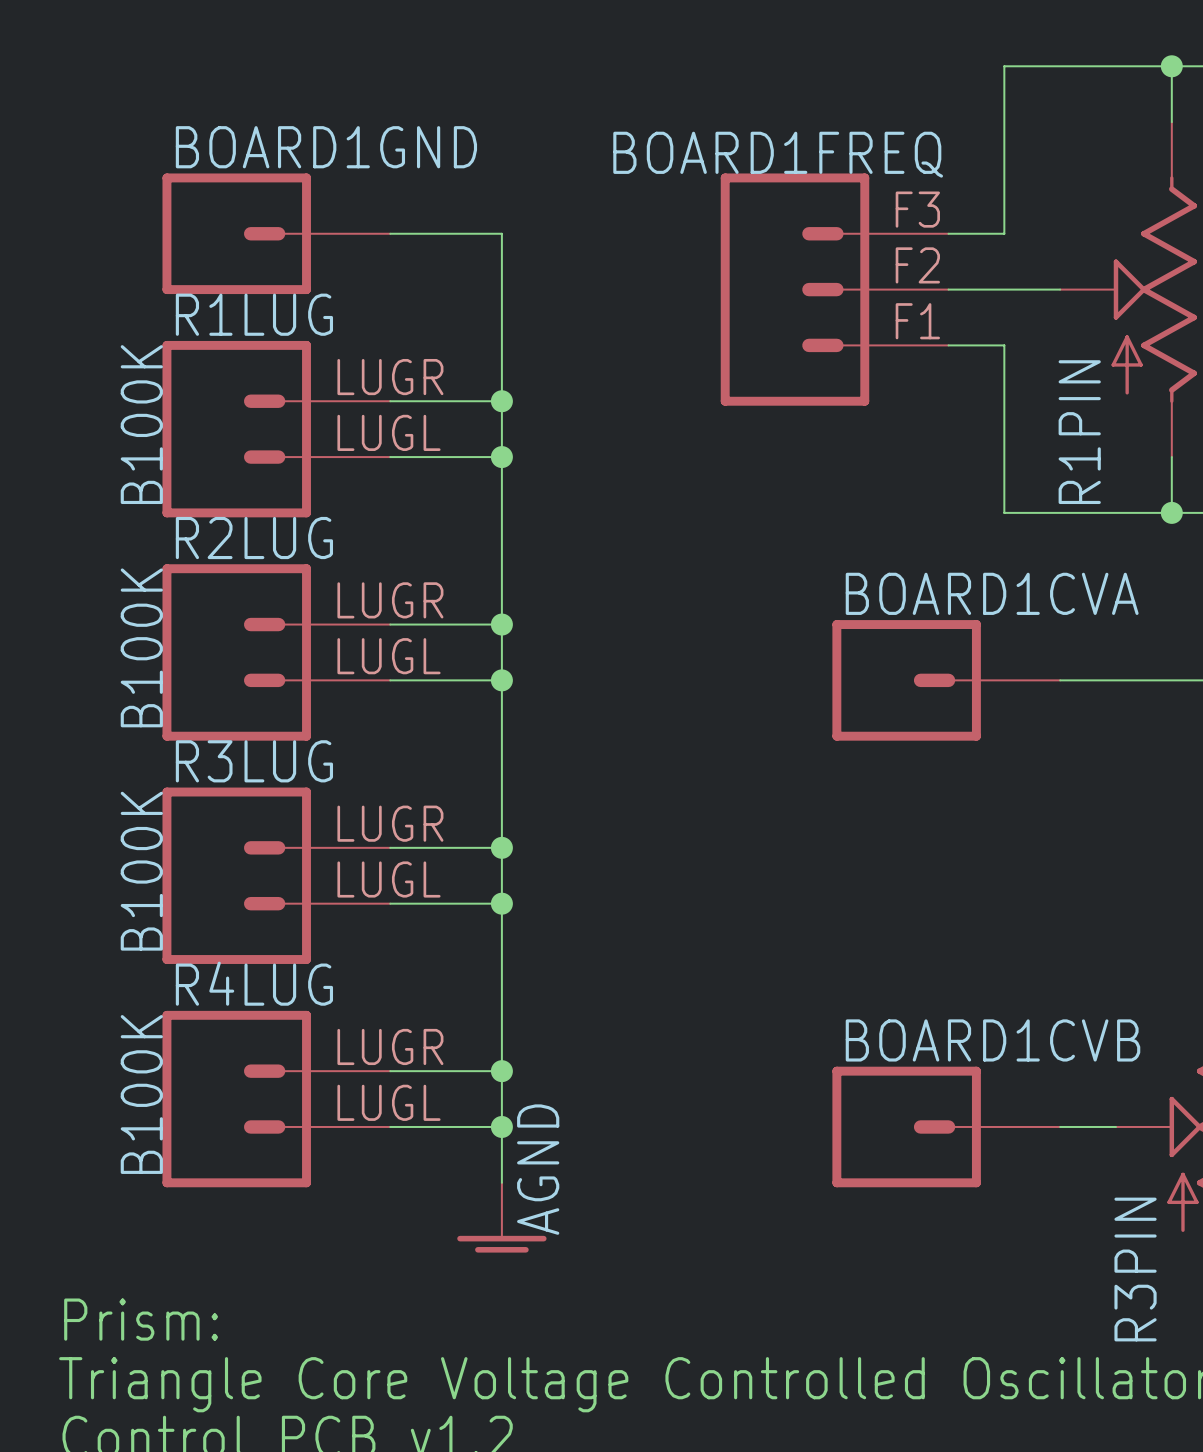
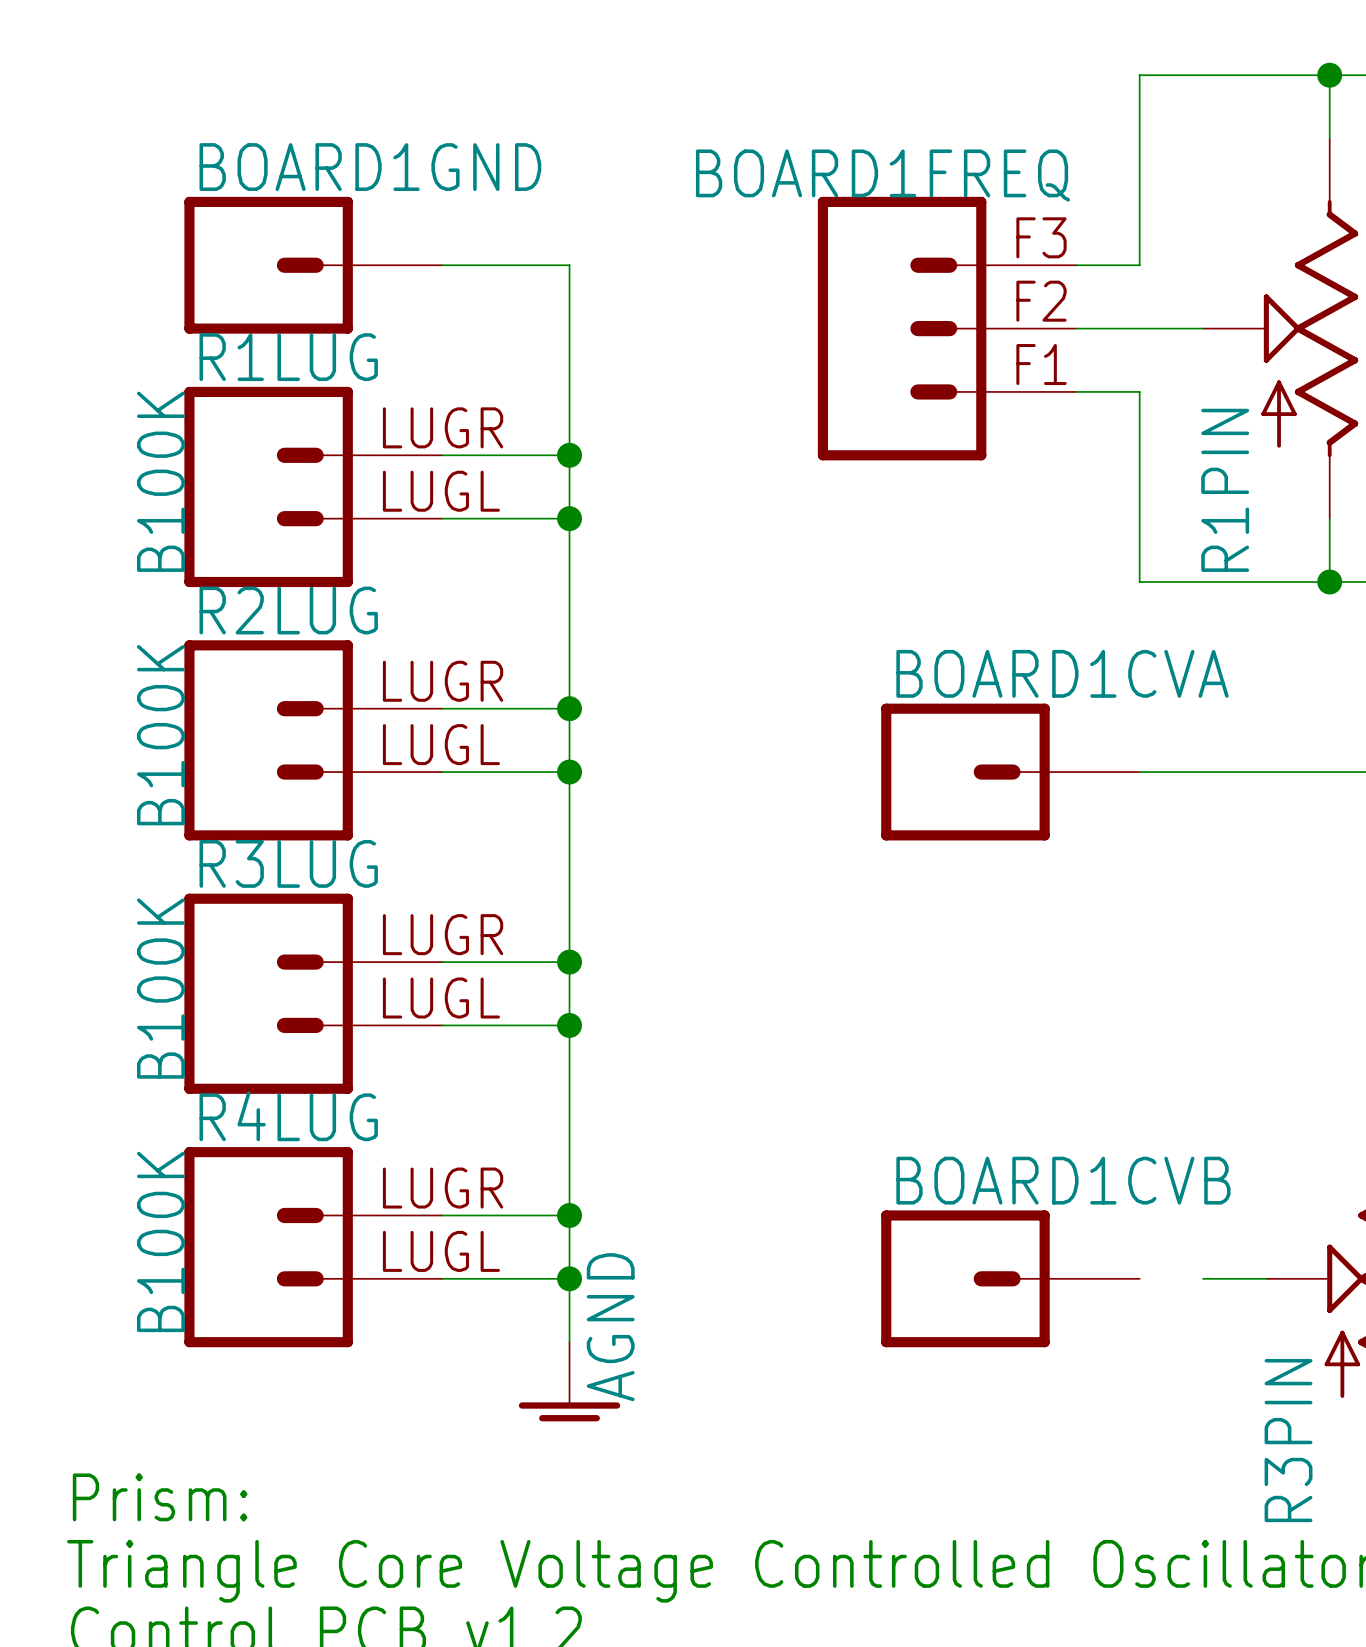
BOARD1CVA position: (946, 680) -> (1010, 772)
BOARD1CVB position: (946, 1126) -> (1010, 1278)

